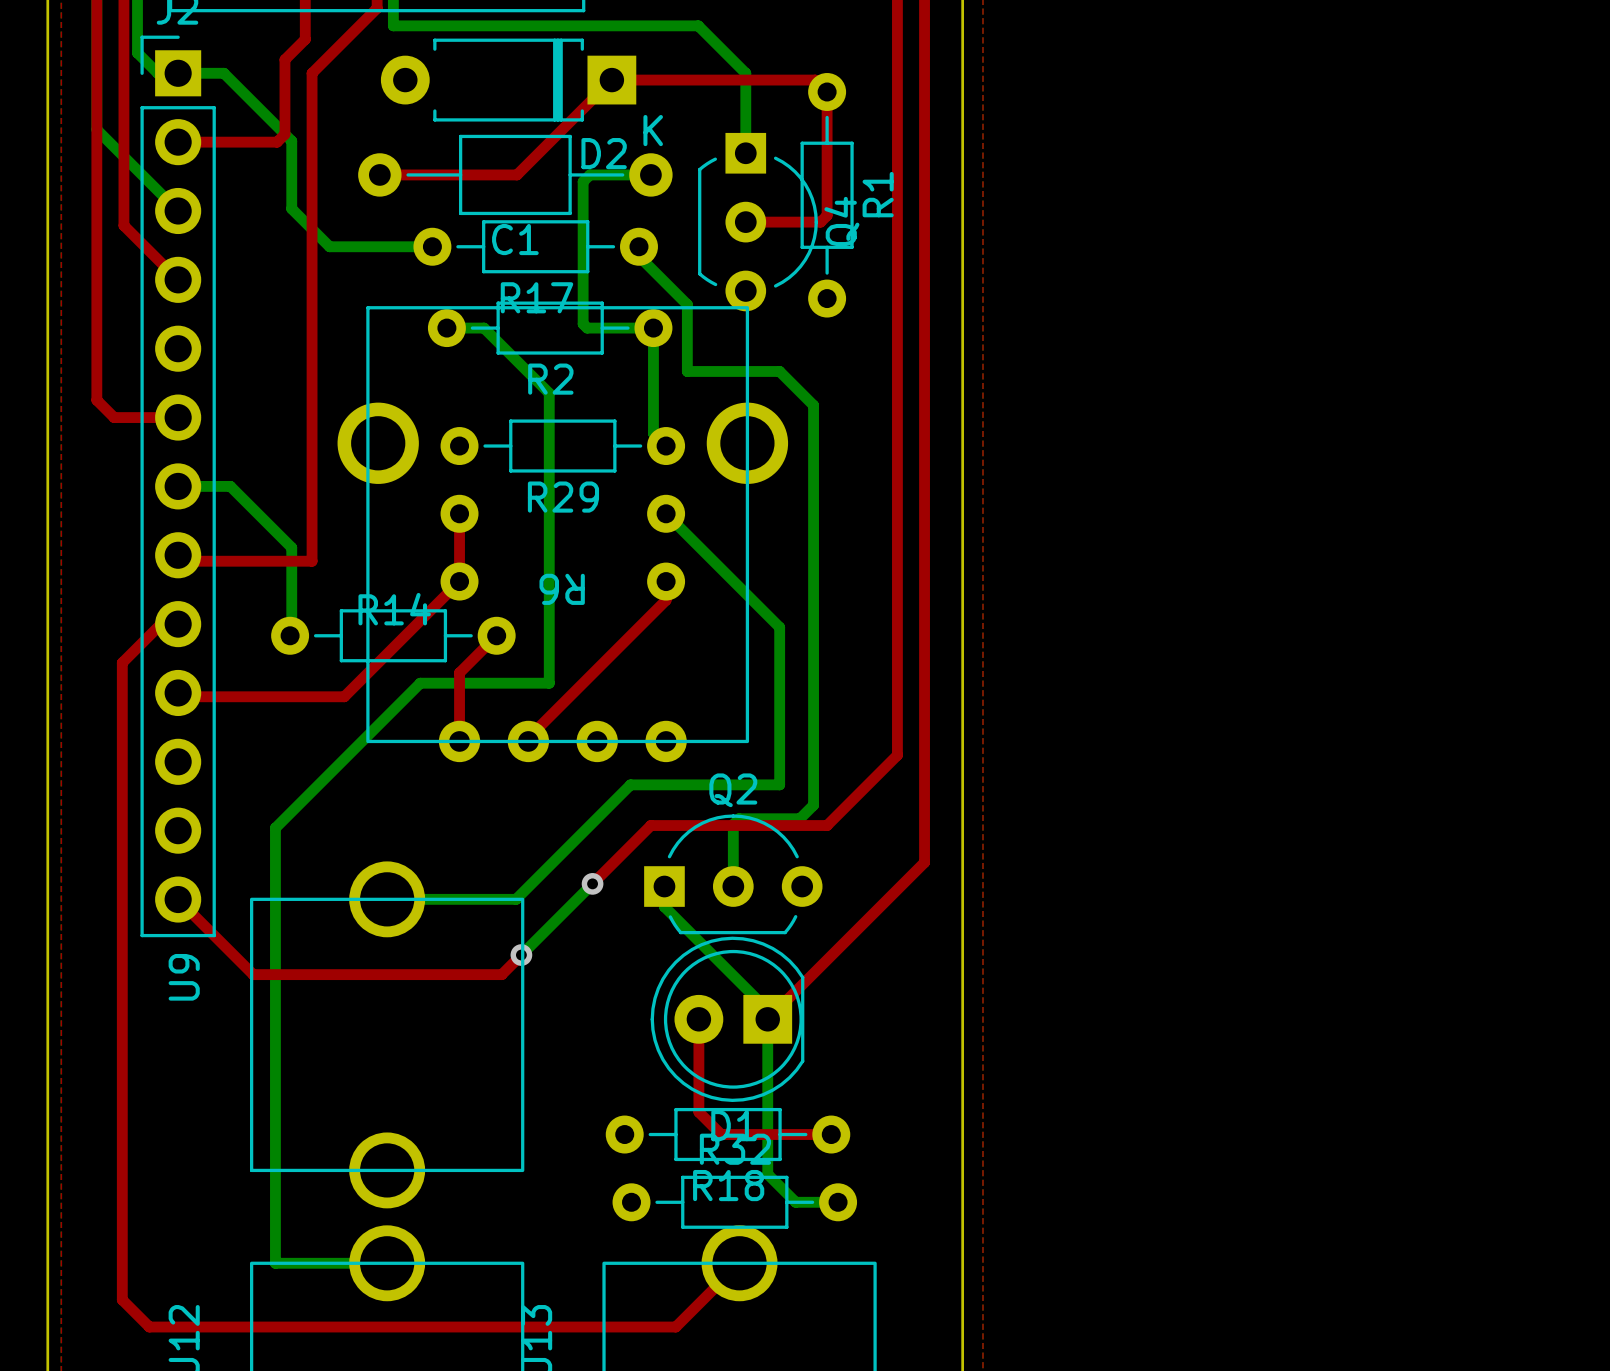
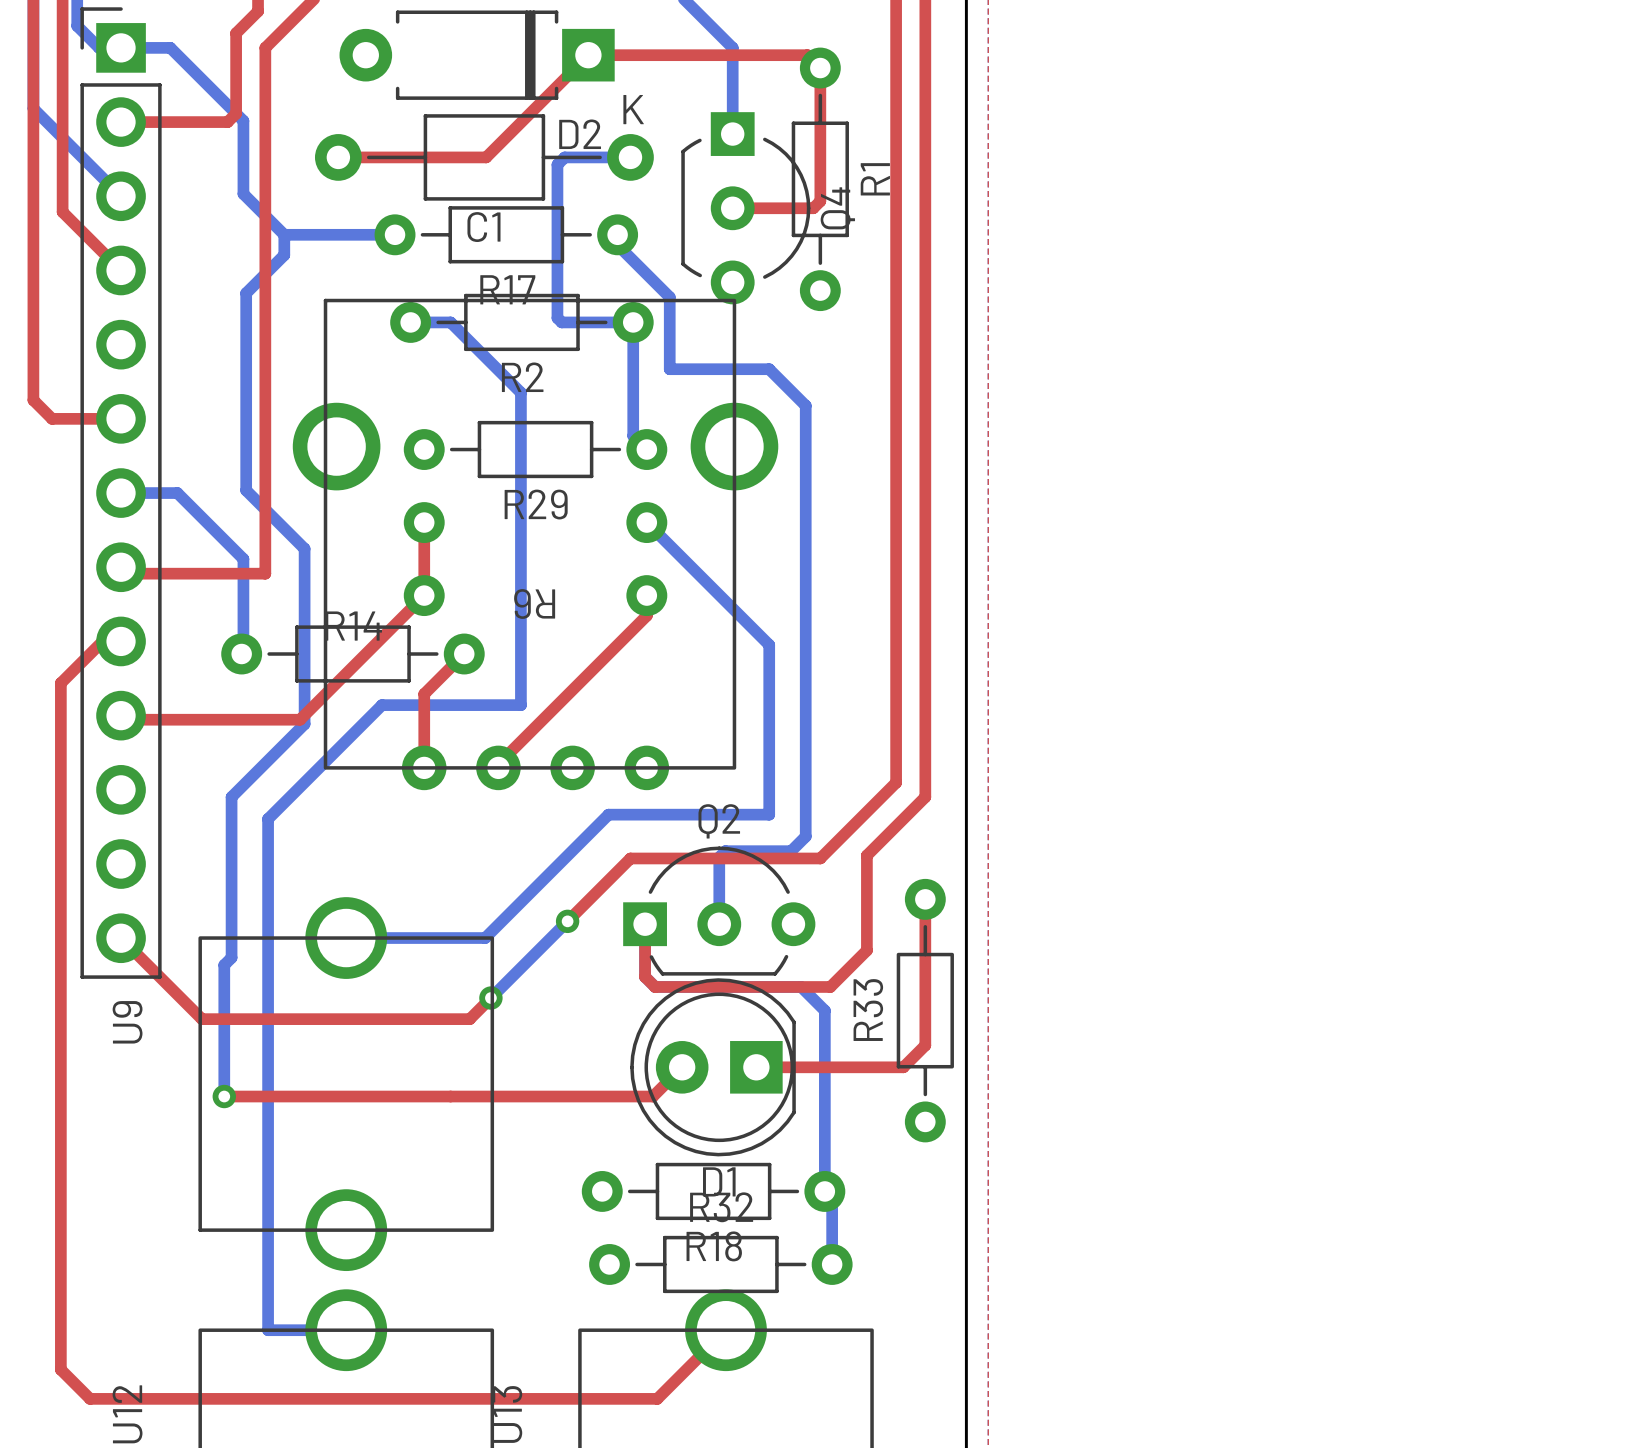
bottom track: none -> (284, 234) (284, 255) (246, 293) (246, 490) (304, 548) (304, 724) (231, 797) (231, 957) (224, 965) (224, 1096)
top track: (924, 768) (924, 862) (767, 1019) -> (925, 898) (925, 1045) (903, 1067) (756, 1067)
top track: none -> (925, 797) (866, 855) (866, 950) (830, 986) (655, 986) (645, 976) (645, 924)
bottom track: (314, 788) (275, 828) (275, 1263) (314, 1263) -> (268, 819) (268, 1330)
bottom track: (664, 906) (767, 1010) -> none
R33: none -> (925, 1010)
top track: (698, 1019) (698, 1112) (721, 1134) (831, 1134) -> (682, 1067) (652, 1096) (224, 1096)
bottom track: (767, 1019) (767, 1174) (795, 1202) (838, 1202) -> (645, 946) (645, 976) (655, 986) (801, 986) (824, 1010) (824, 1191) (832, 1198) (832, 1264)
via: none -> (224, 1096)

